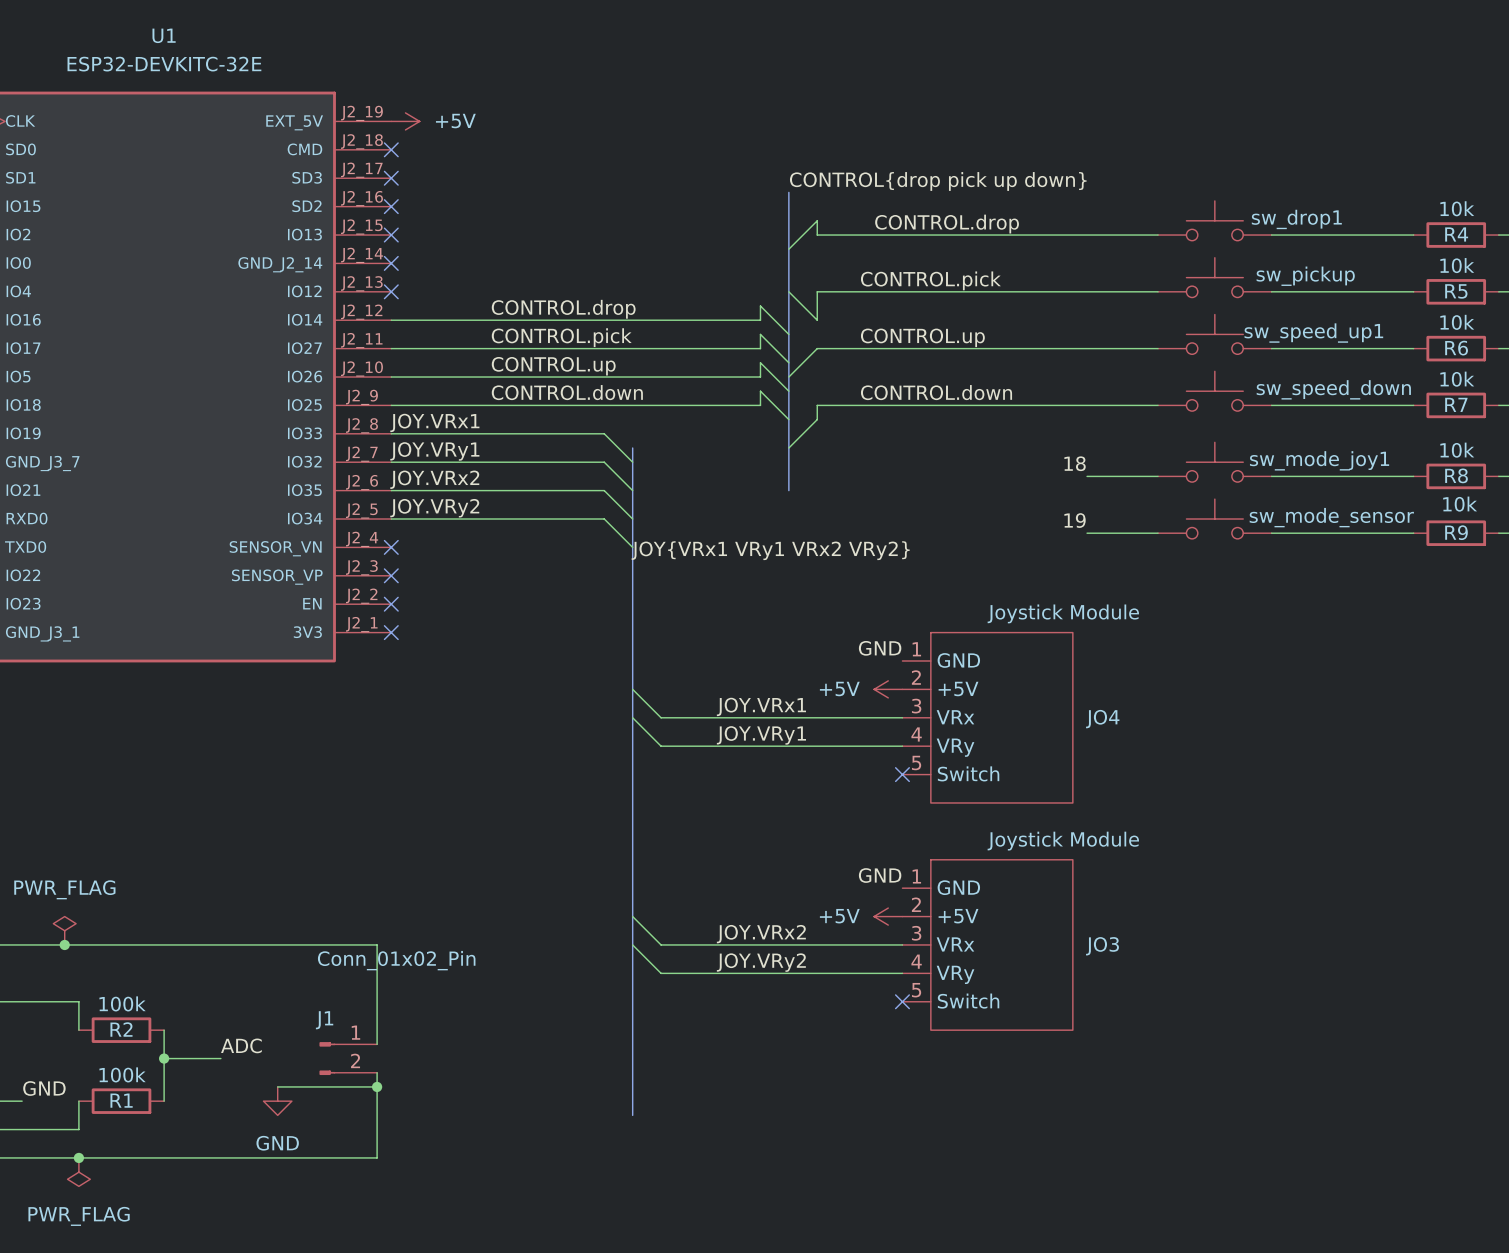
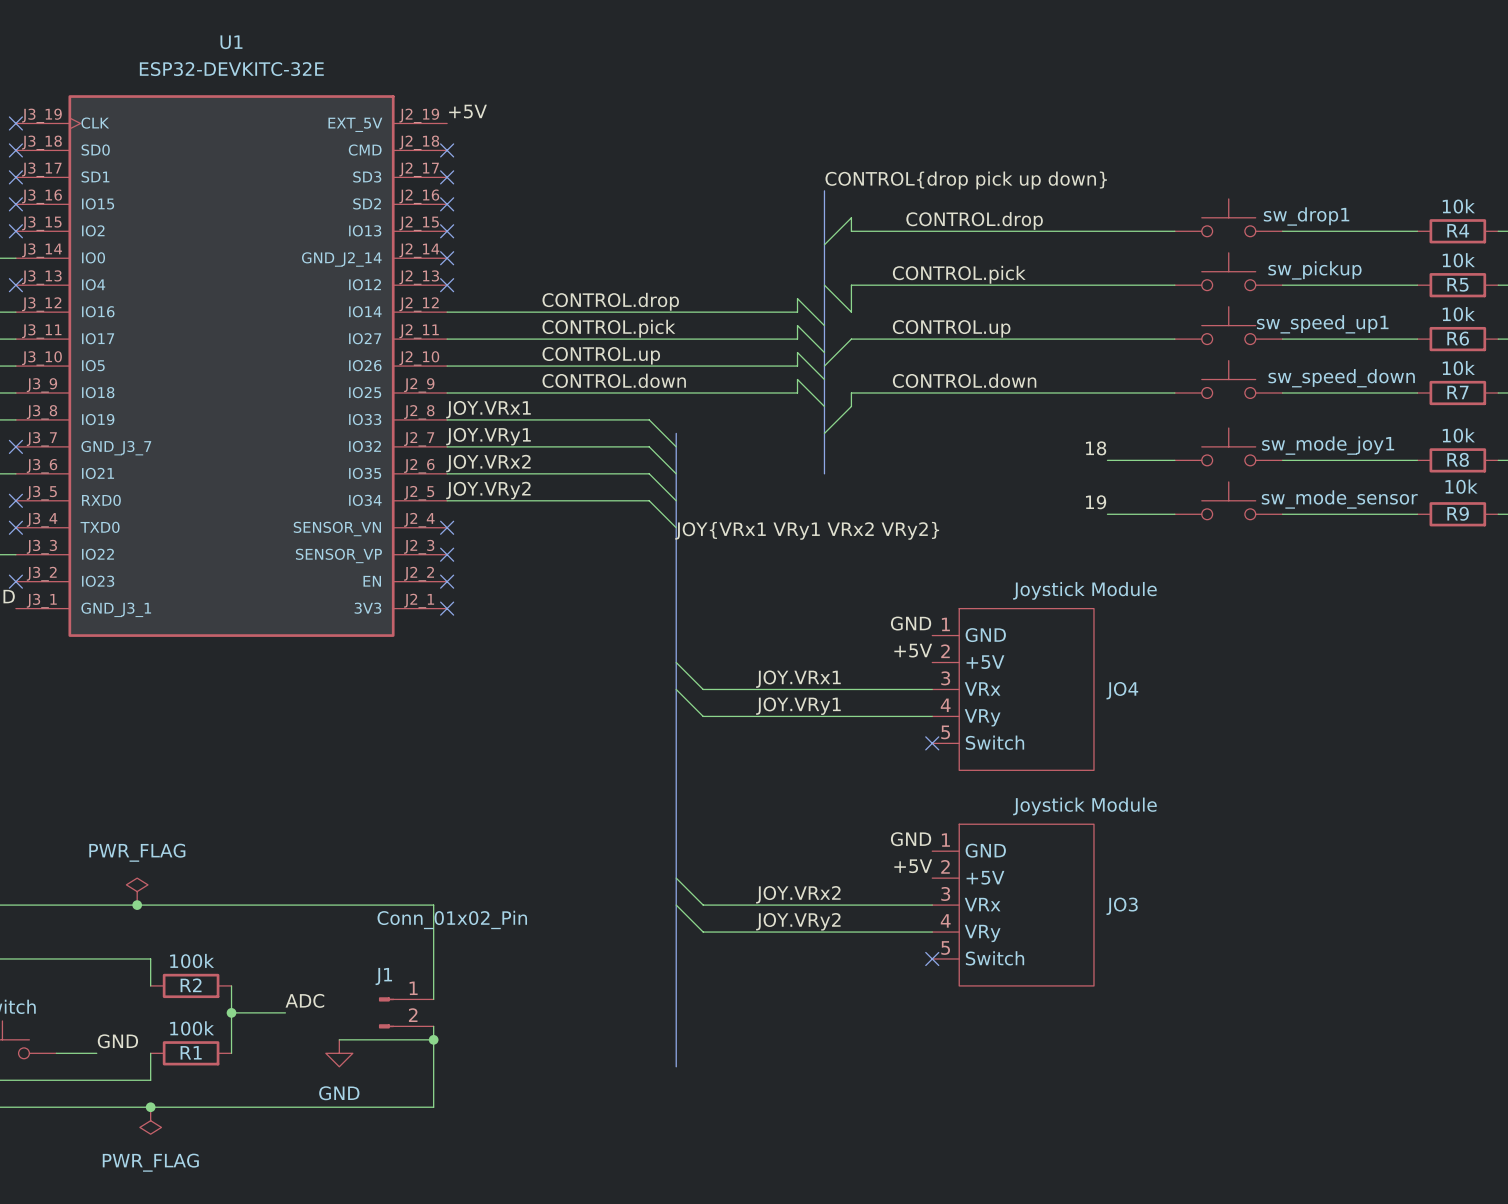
label: none -> +5V (467, 111)
power symbol: +5V (405, 121) -> none
label: none -> +5V (913, 650)
power symbol: +5V (888, 689) -> none
label: none -> +5V (913, 866)
power symbol: +5V (888, 916) -> none

